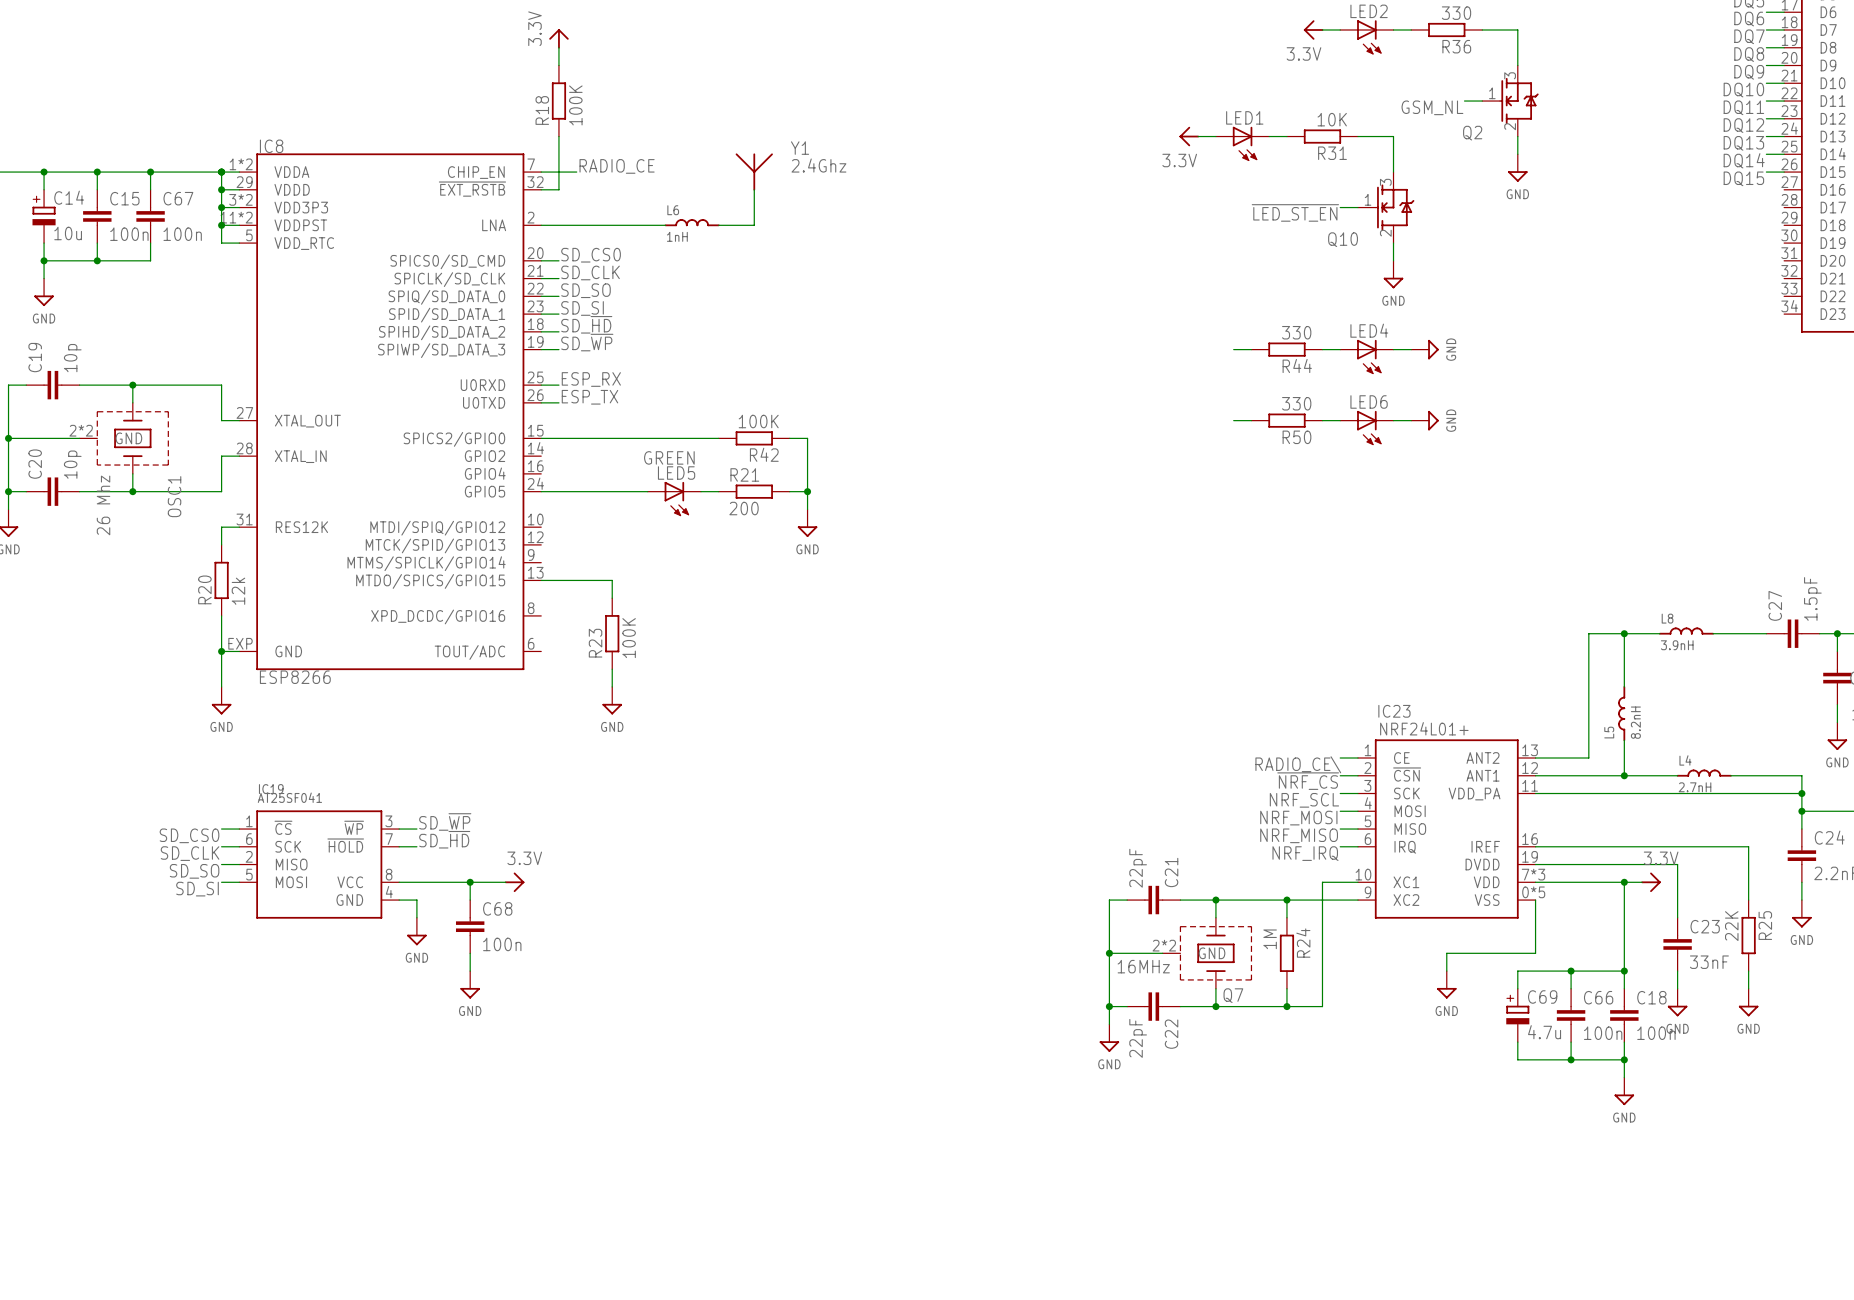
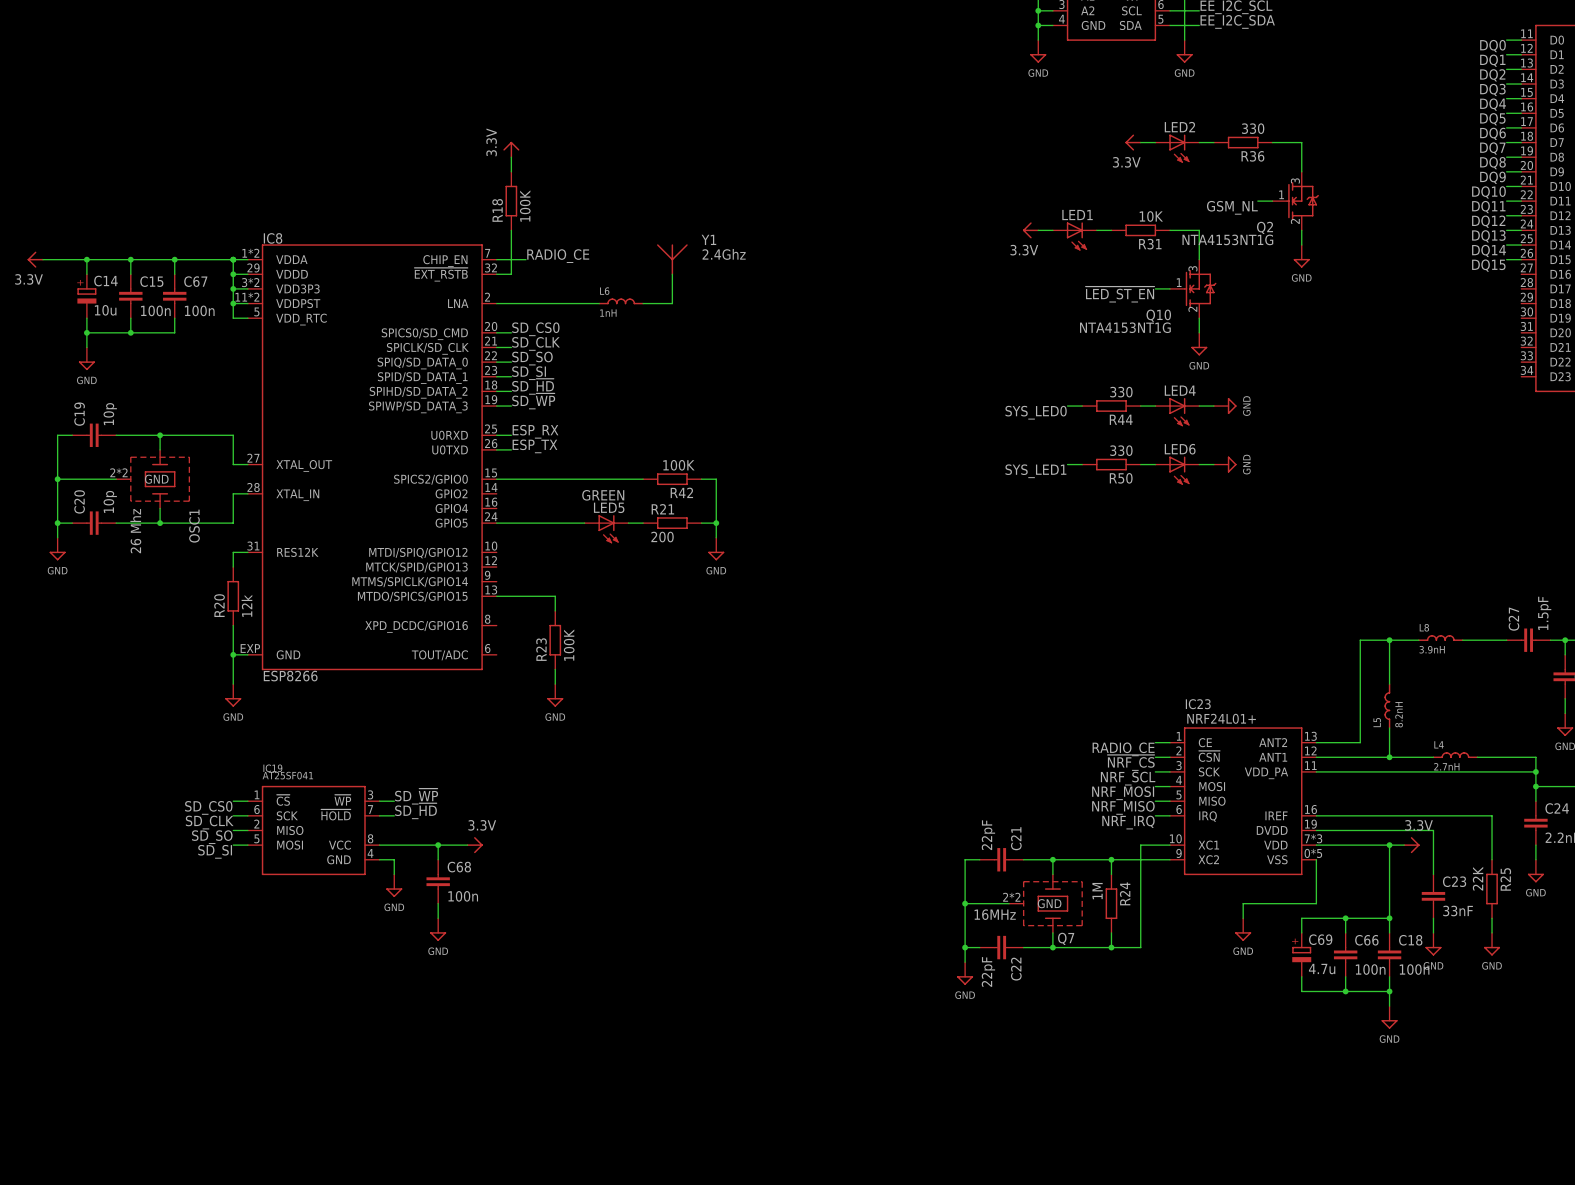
Q2 value: none -> NTA4153NT1G (1227, 239)
Q10 value: none -> NTA4153NT1G (1125, 327)
label: none -> SYS_LED0 (1036, 412)
label: none -> SYS_LED1 (1035, 471)
label: RADIO_CE\ (1298, 764) -> RADIO_CE (1123, 749)

